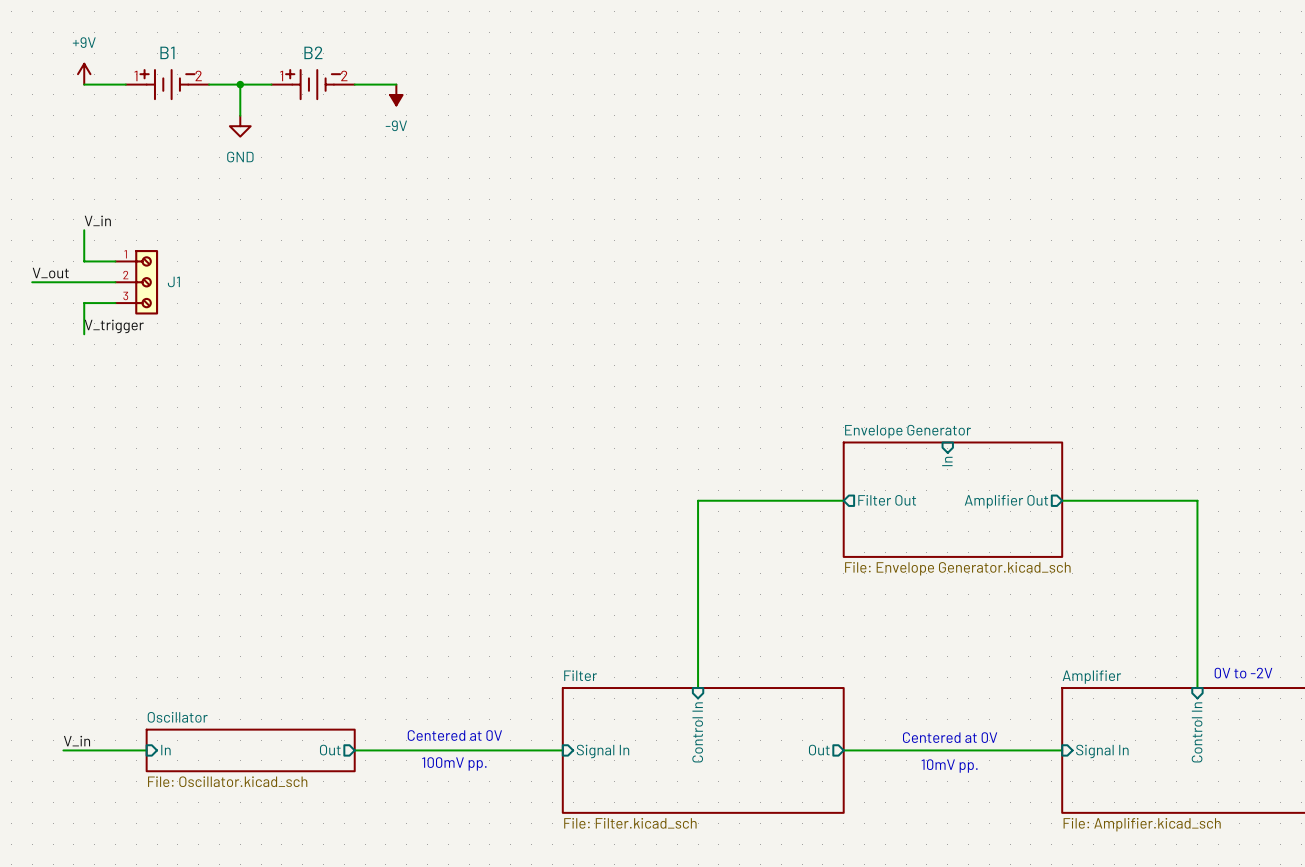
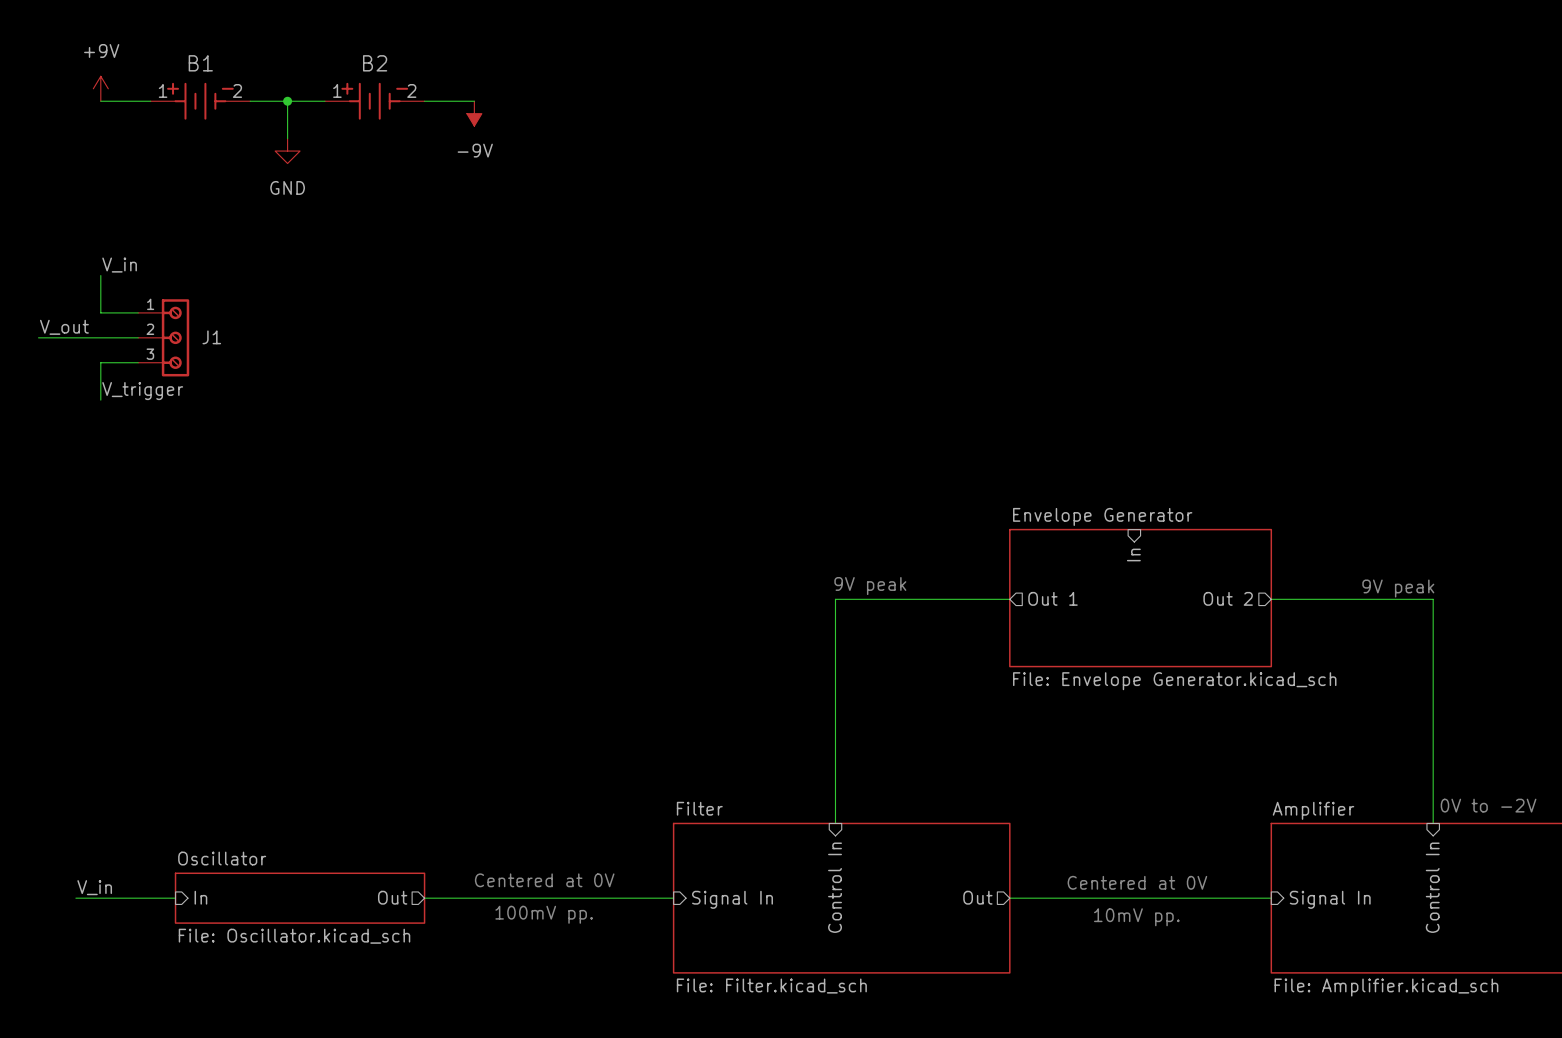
text: none -> 9V peak (870, 586)
text: none -> 9V peak (1398, 588)
sheet pin: Filter Out (887, 500) -> Out 1 (1053, 598)
sheet pin: Amplifier Out (1006, 501) -> Out 2 (1228, 598)

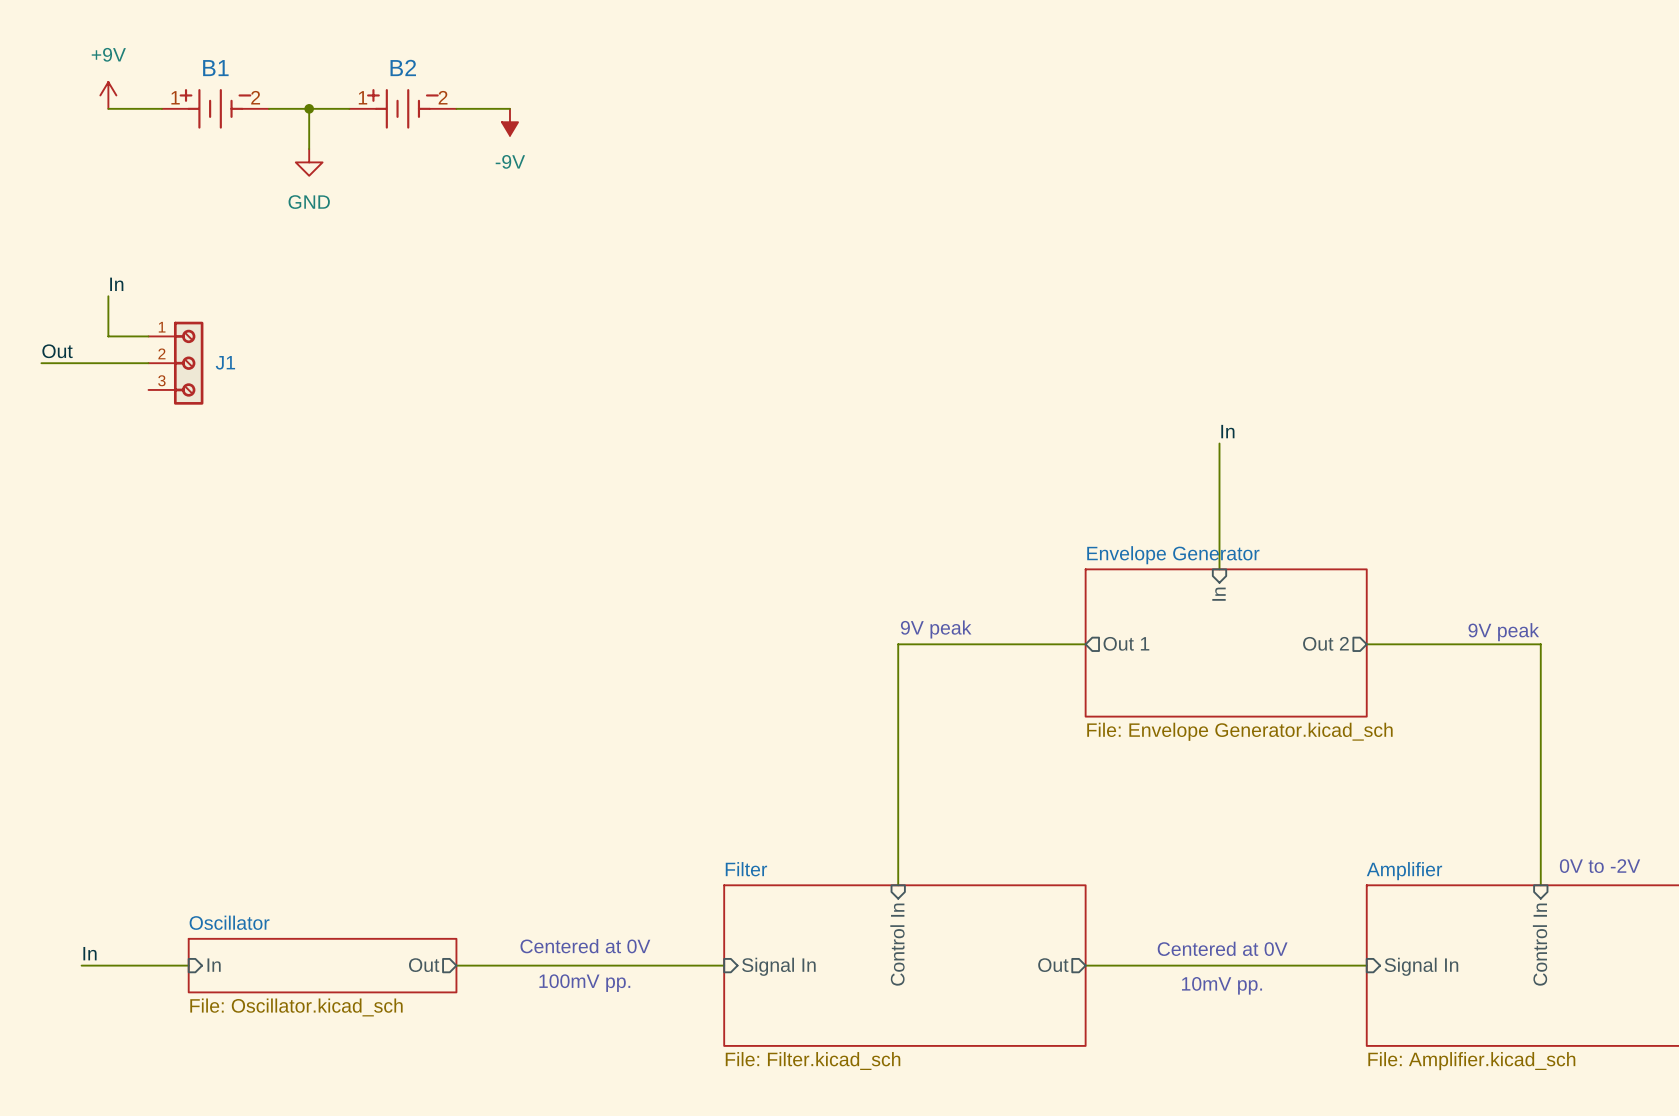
label: V_in (119, 265) -> In (116, 284)
label: V_out (64, 327) -> Out (57, 351)
wire: (138, 362) (100, 362) (100, 400) -> none
label: V_trigger (142, 391) -> none
label: none -> In (1227, 431)
wire: none -> (1219, 443) (1219, 569)
label: V_in (94, 887) -> In (89, 953)

